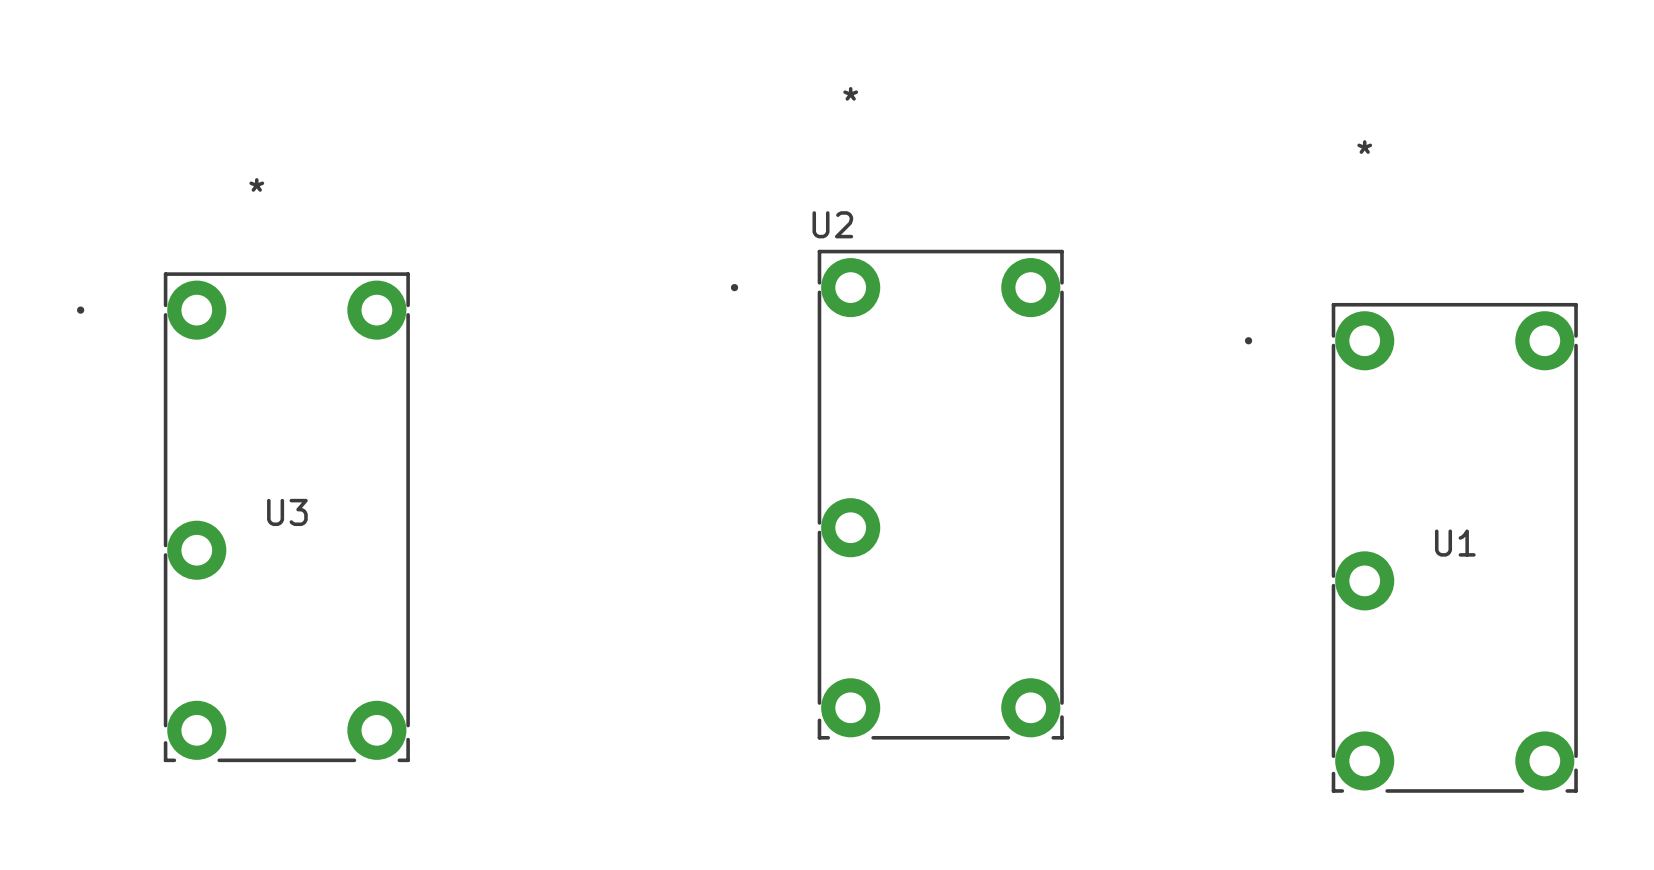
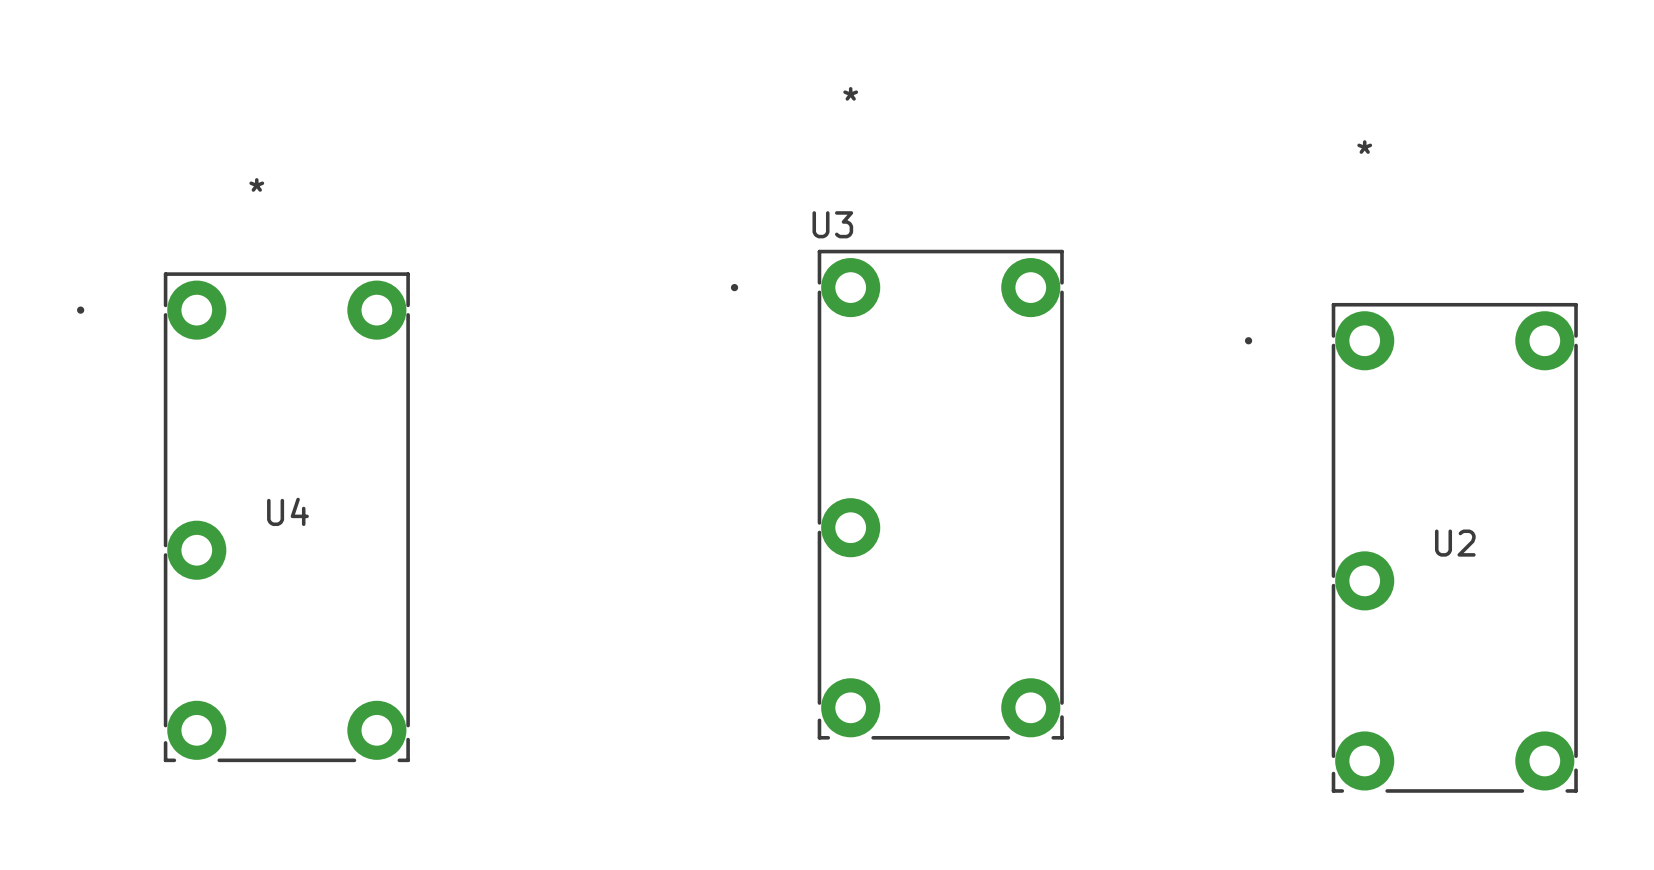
U2 name: U2 (832, 224) -> U3 (832, 224)
U3 name: U3 (287, 512) -> U4 (287, 511)
U1 name: U1 (1455, 543) -> U2 (1455, 543)

